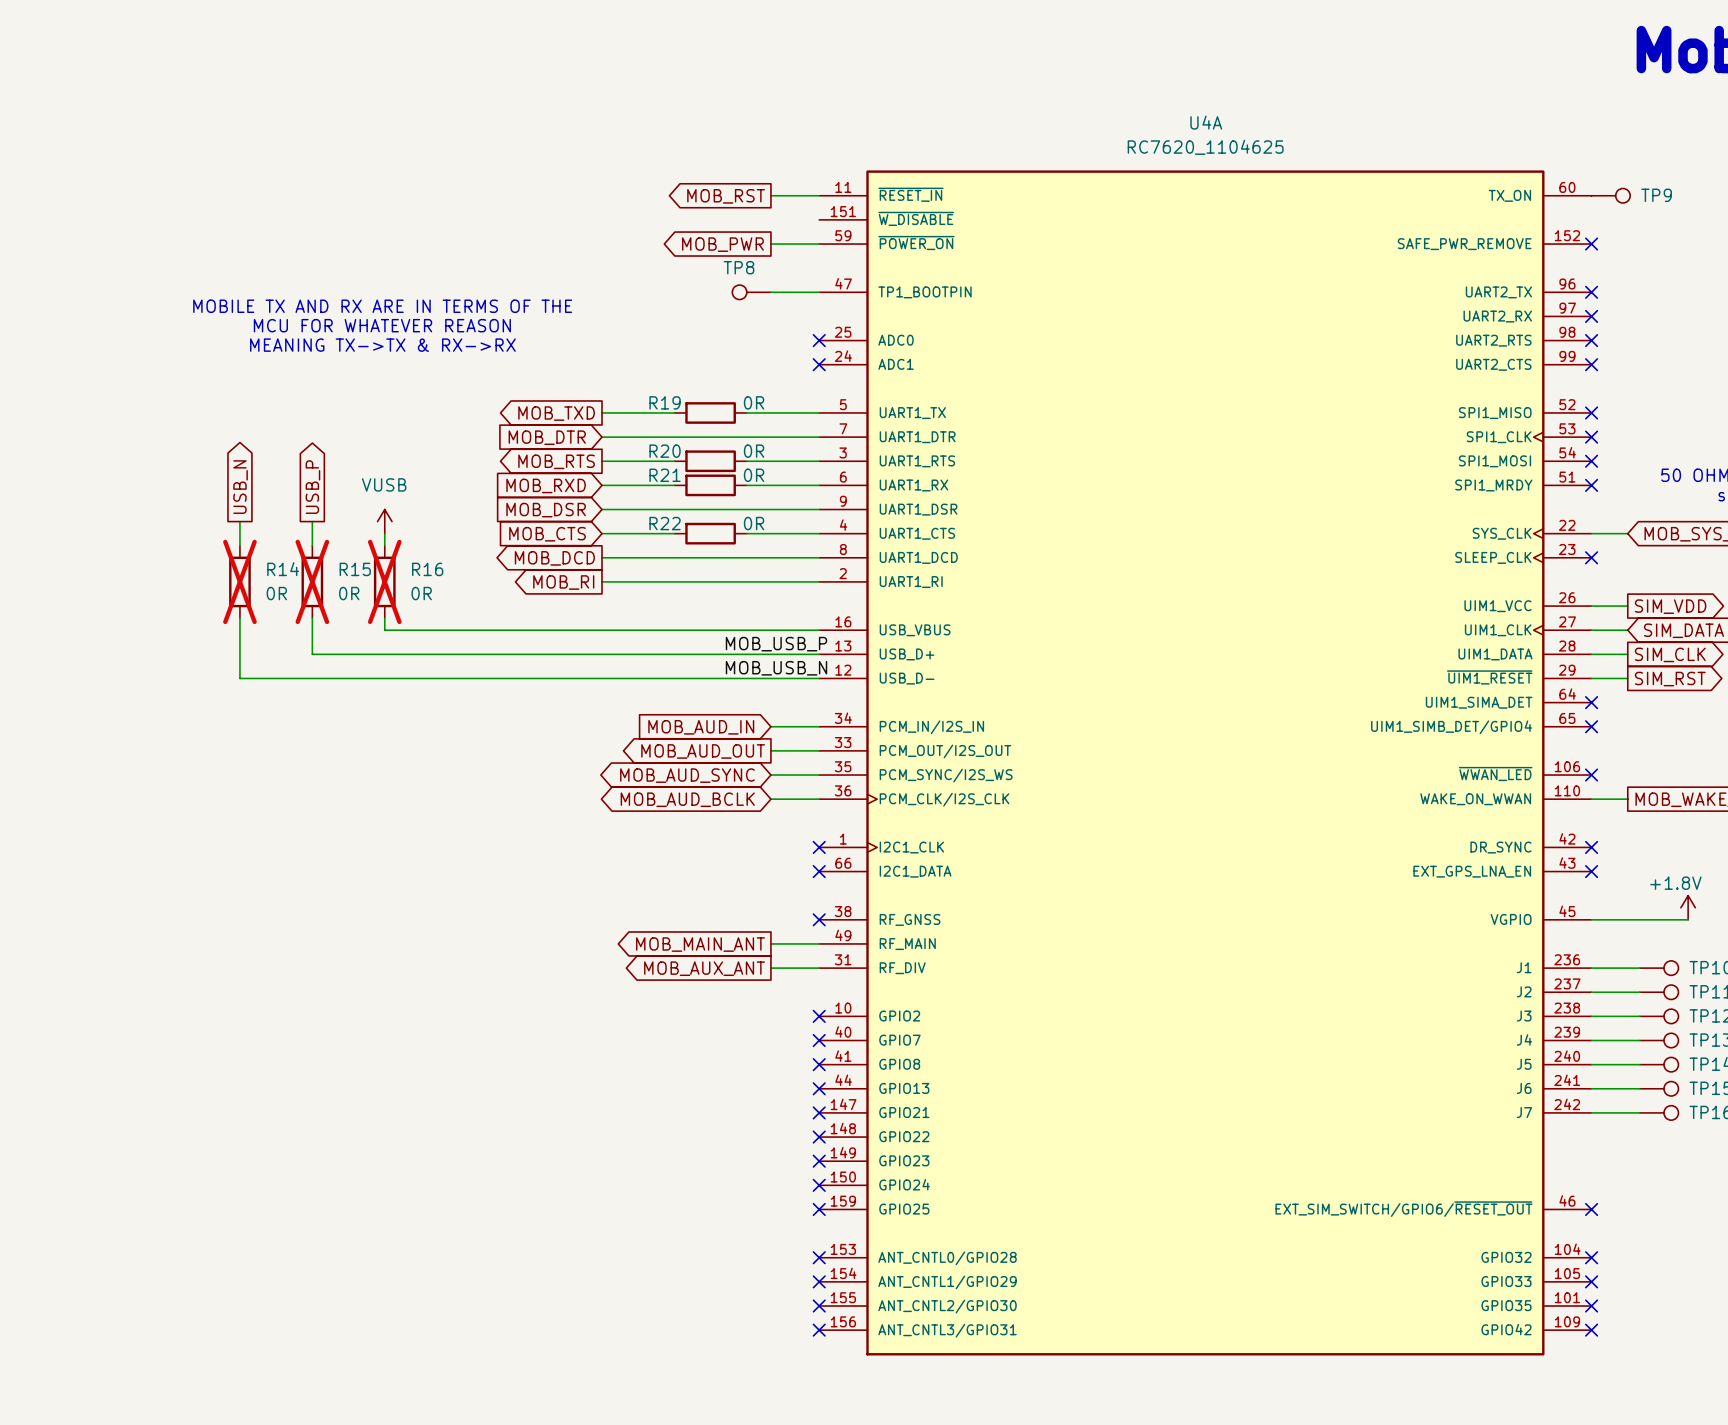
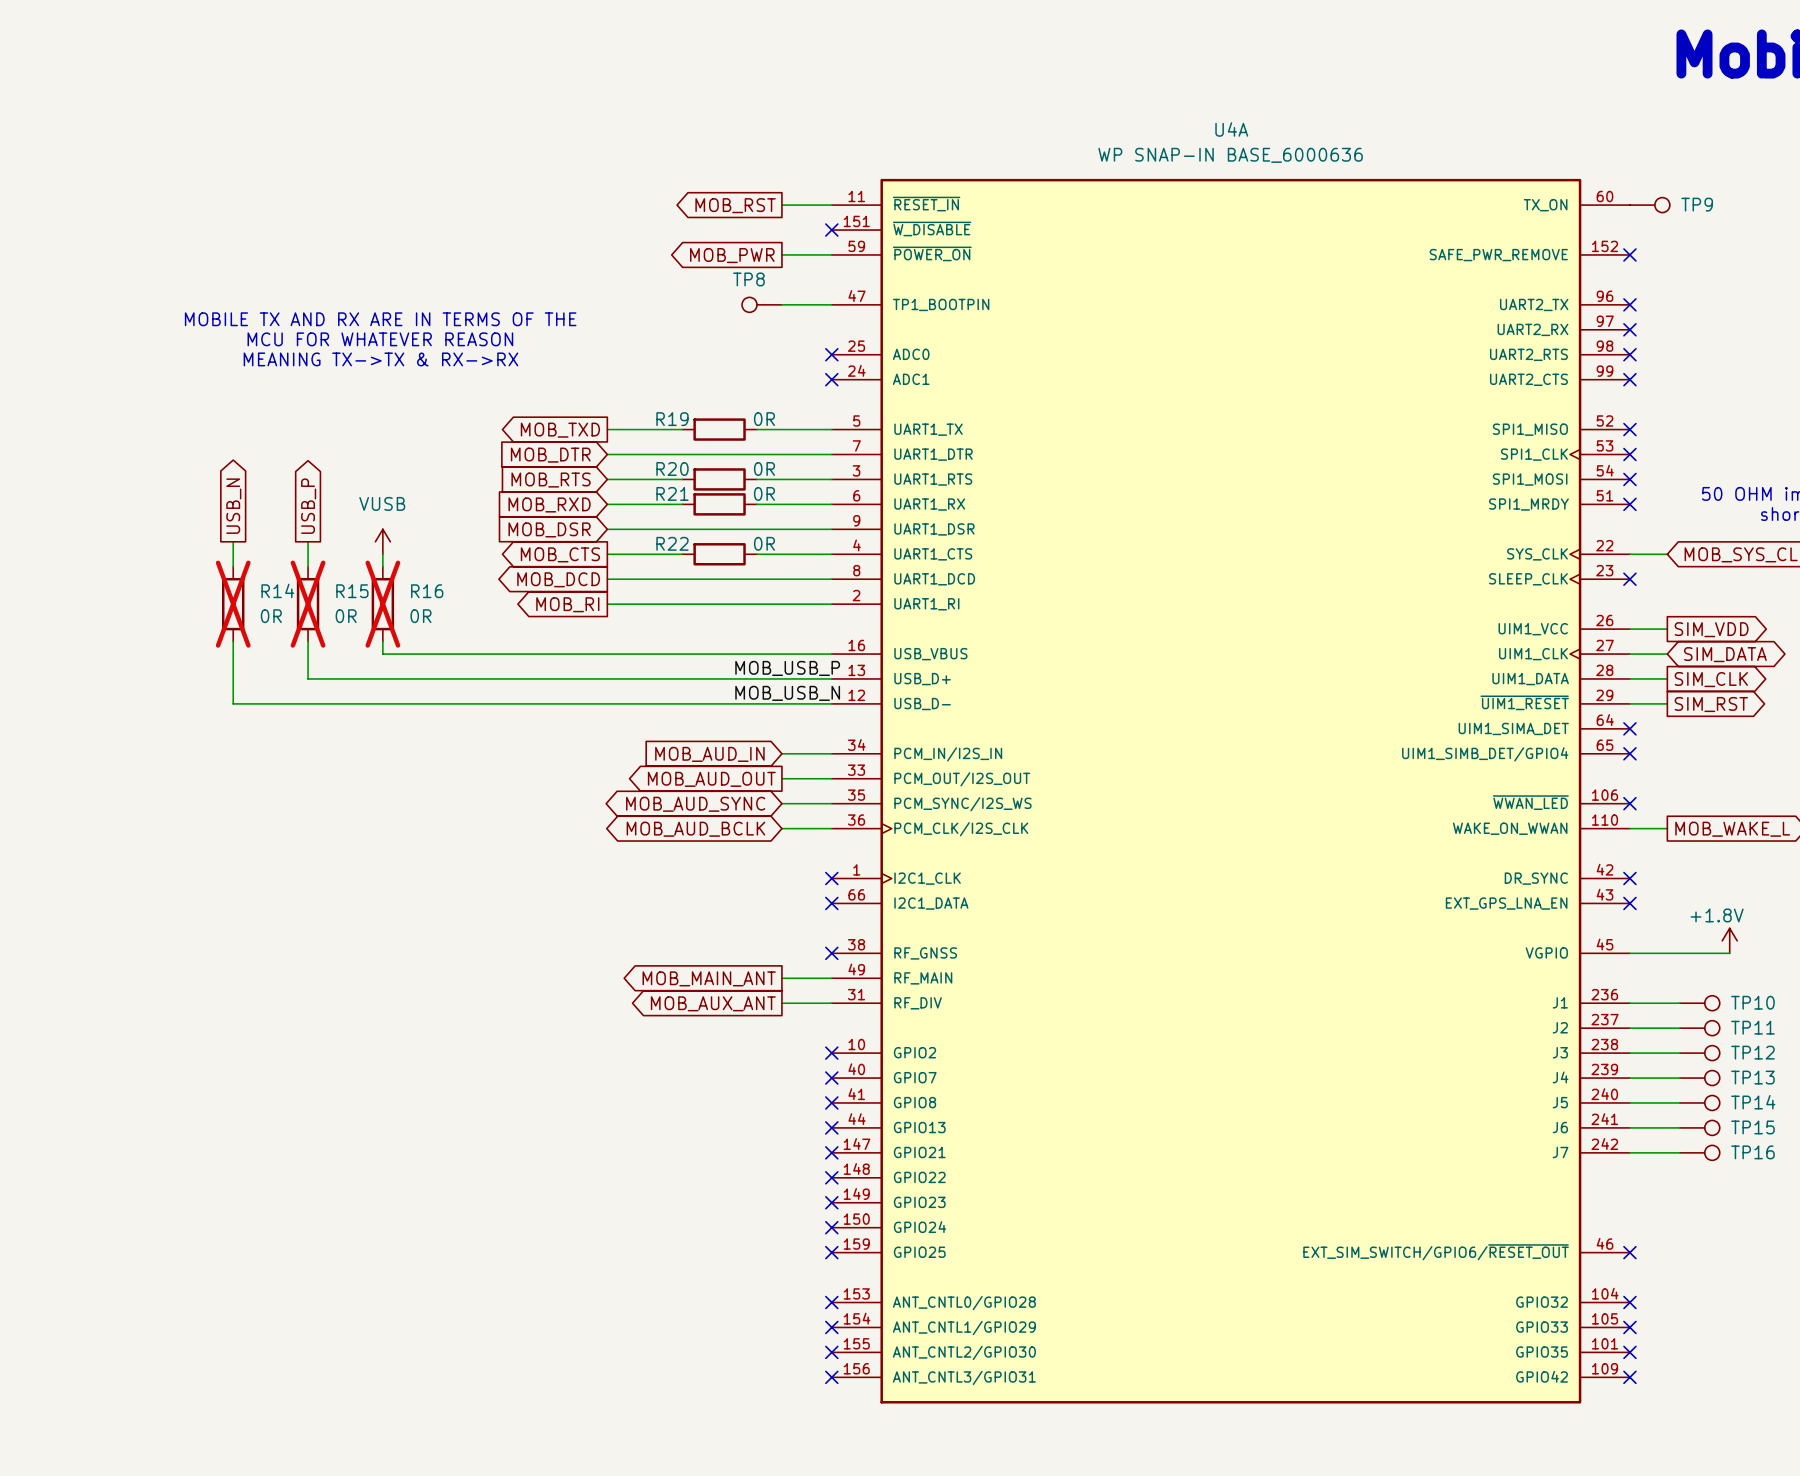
U4A value: RC7620_1104625 (1205, 147) -> WP SNAP-IN BASE_6000636 (1230, 155)
no-connect mark: none -> (831, 230)
global label shape: output (556, 461) -> input (551, 480)
global label shape: input (547, 534) -> output (560, 554)

